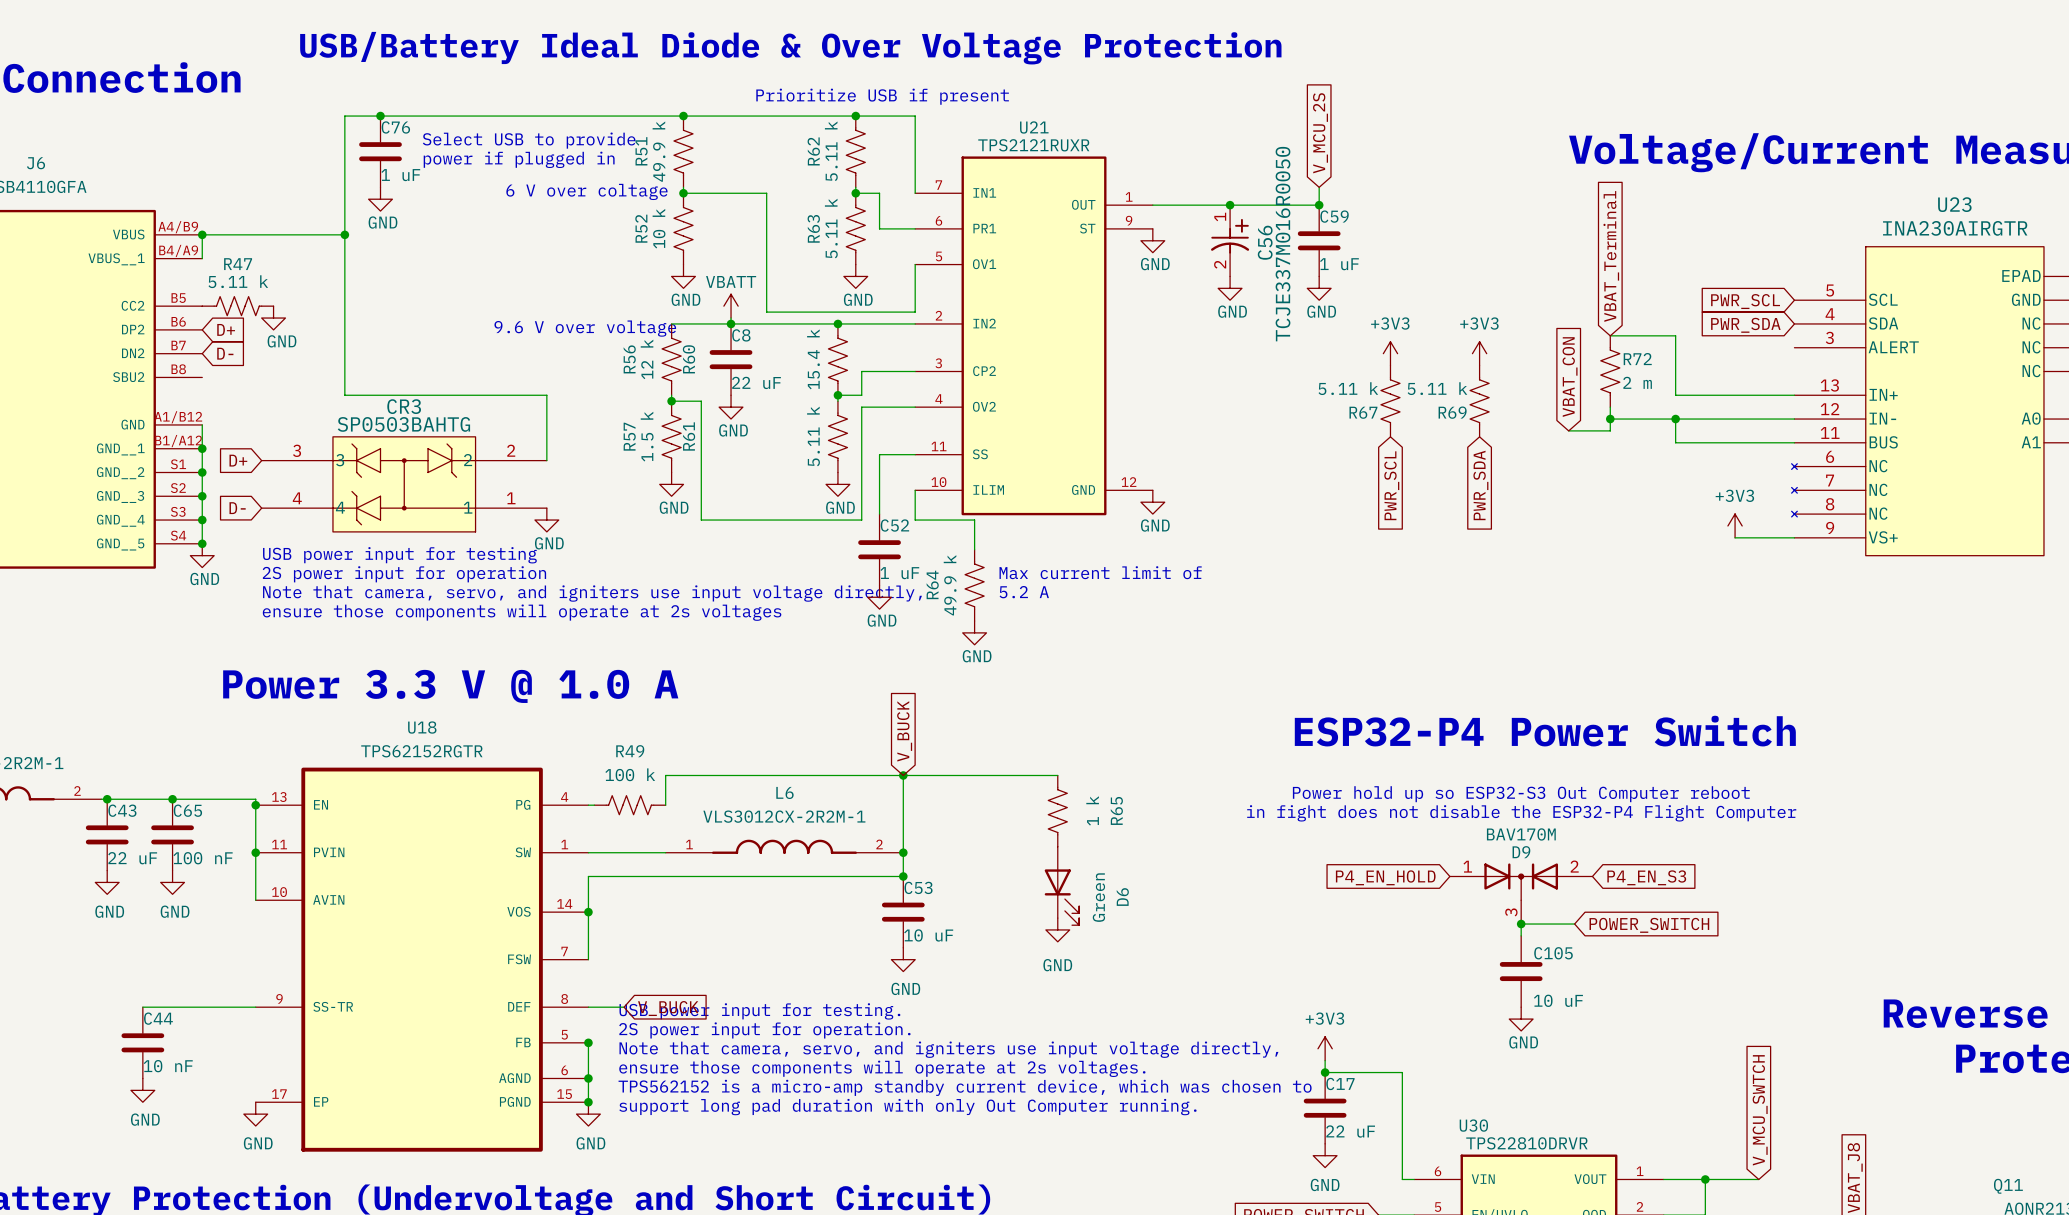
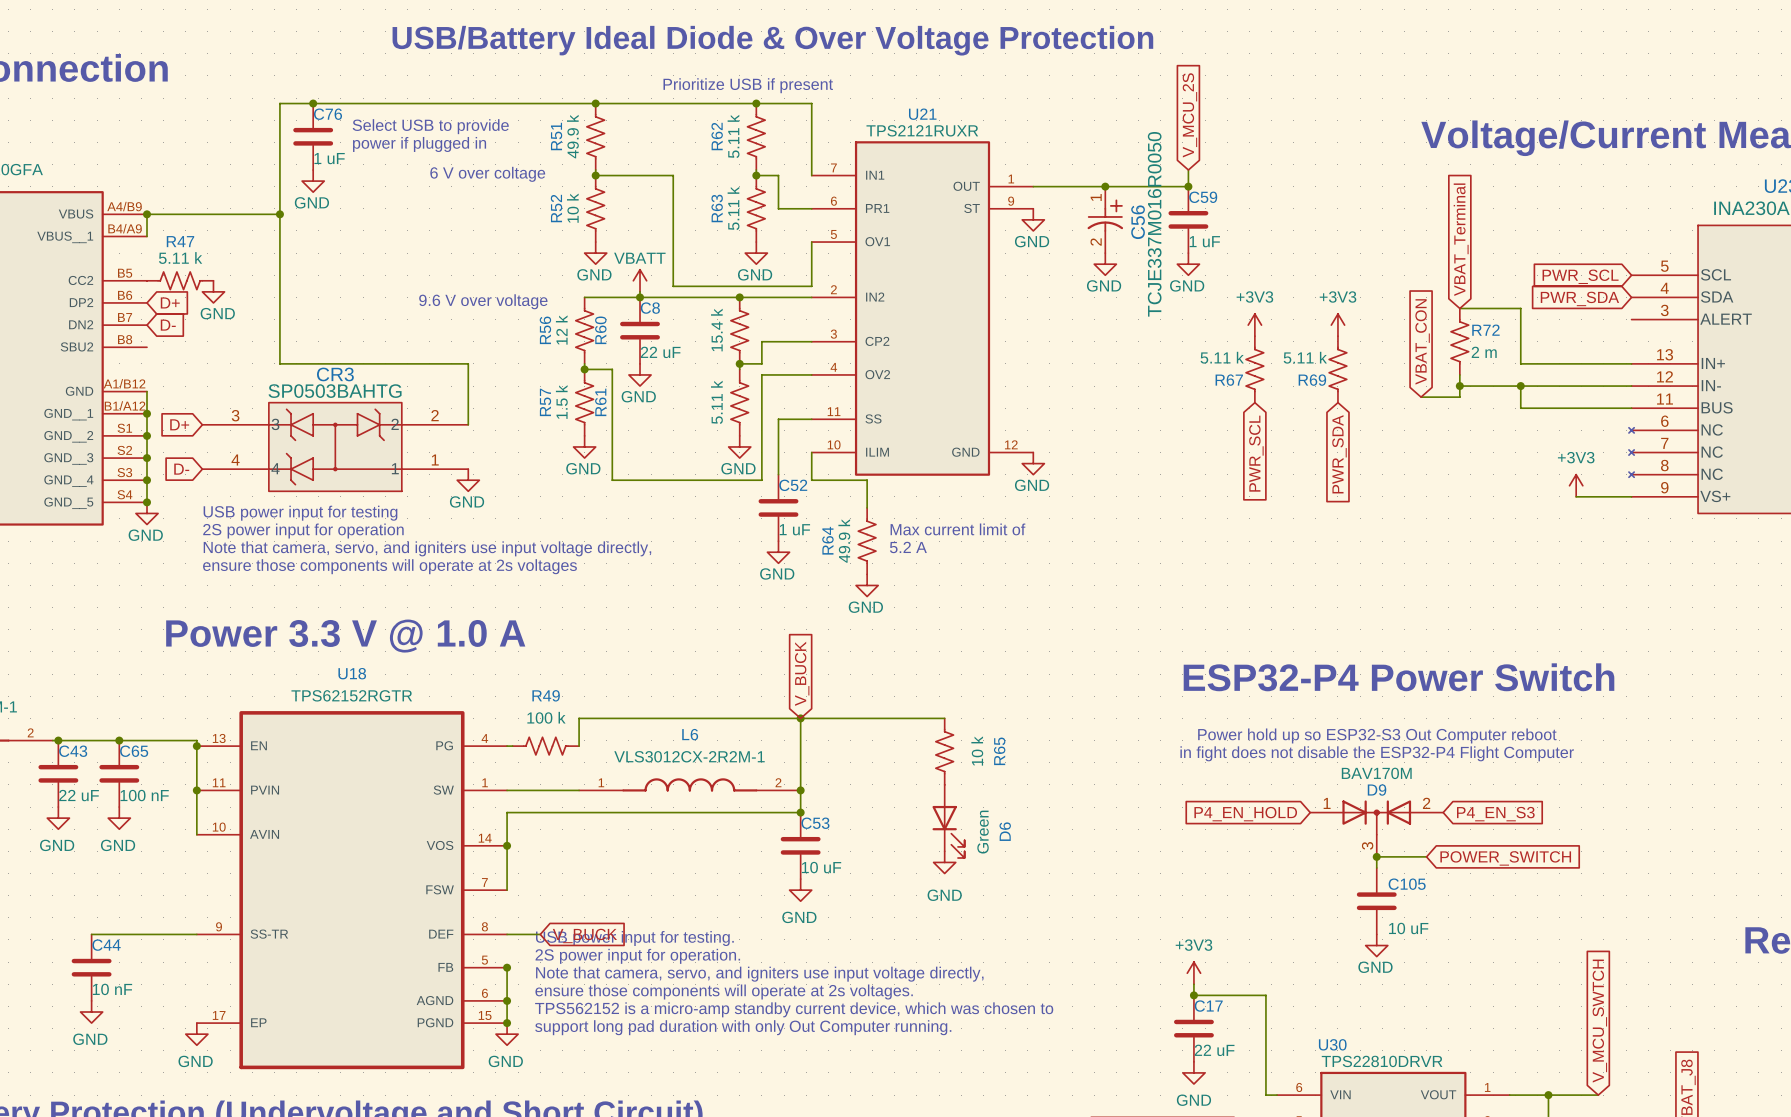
R65 value: 1 k (1092, 810) -> 10 k (977, 751)

